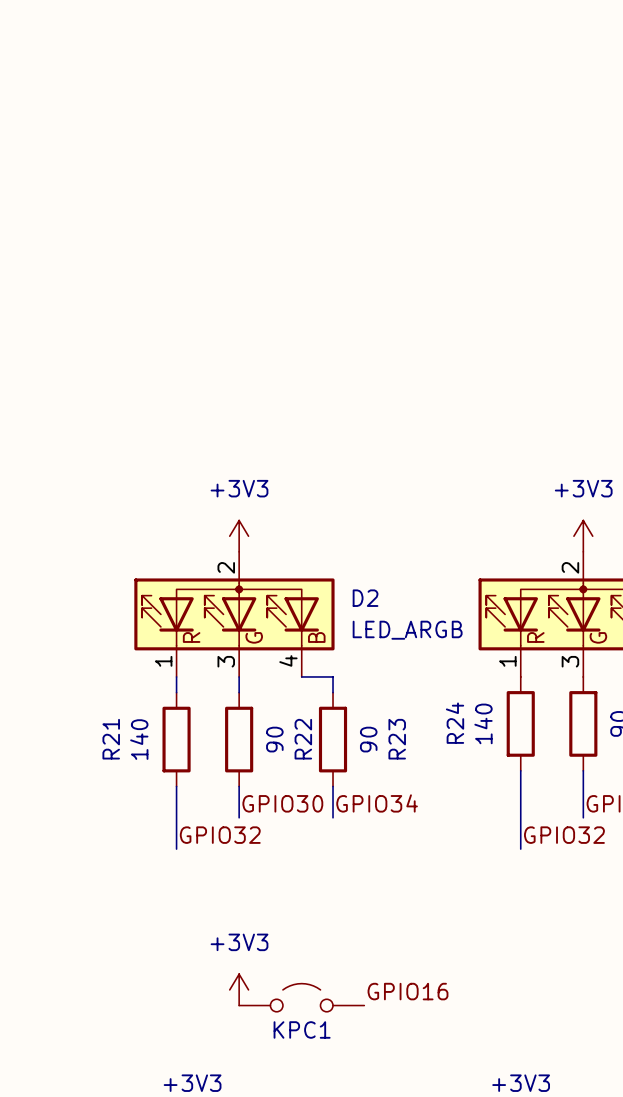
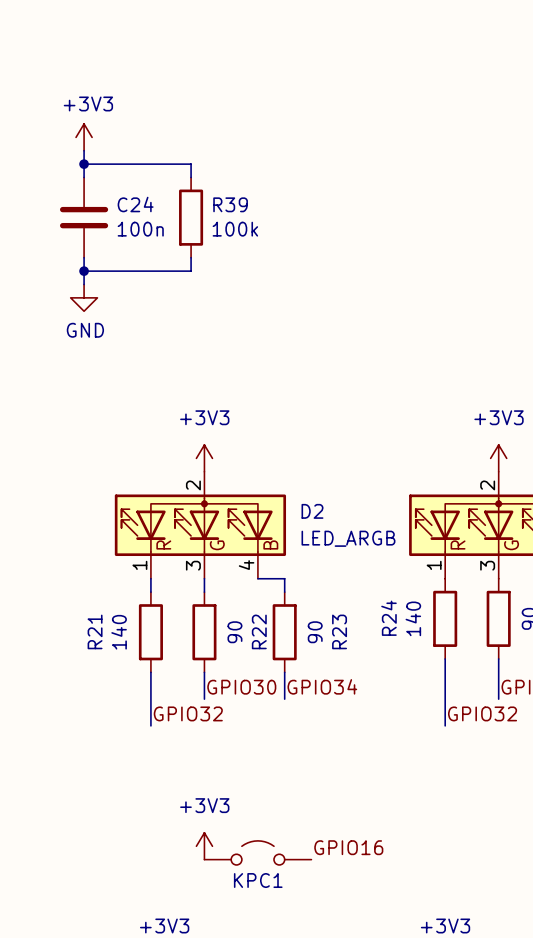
power symbol: none -> +3V3 (84, 137)
wire: none -> (84, 150) (84, 177)
wire: none -> (84, 164) (191, 164) (191, 177)
junction: none -> (84, 164)
C24: none -> 100n (84, 217)
R39: none -> 100k (191, 217)
wire: none -> (84, 257) (84, 284)
wire: none -> (191, 257) (191, 271) (84, 271)
junction: none -> (84, 271)
power symbol: none -> GND (84, 297)

